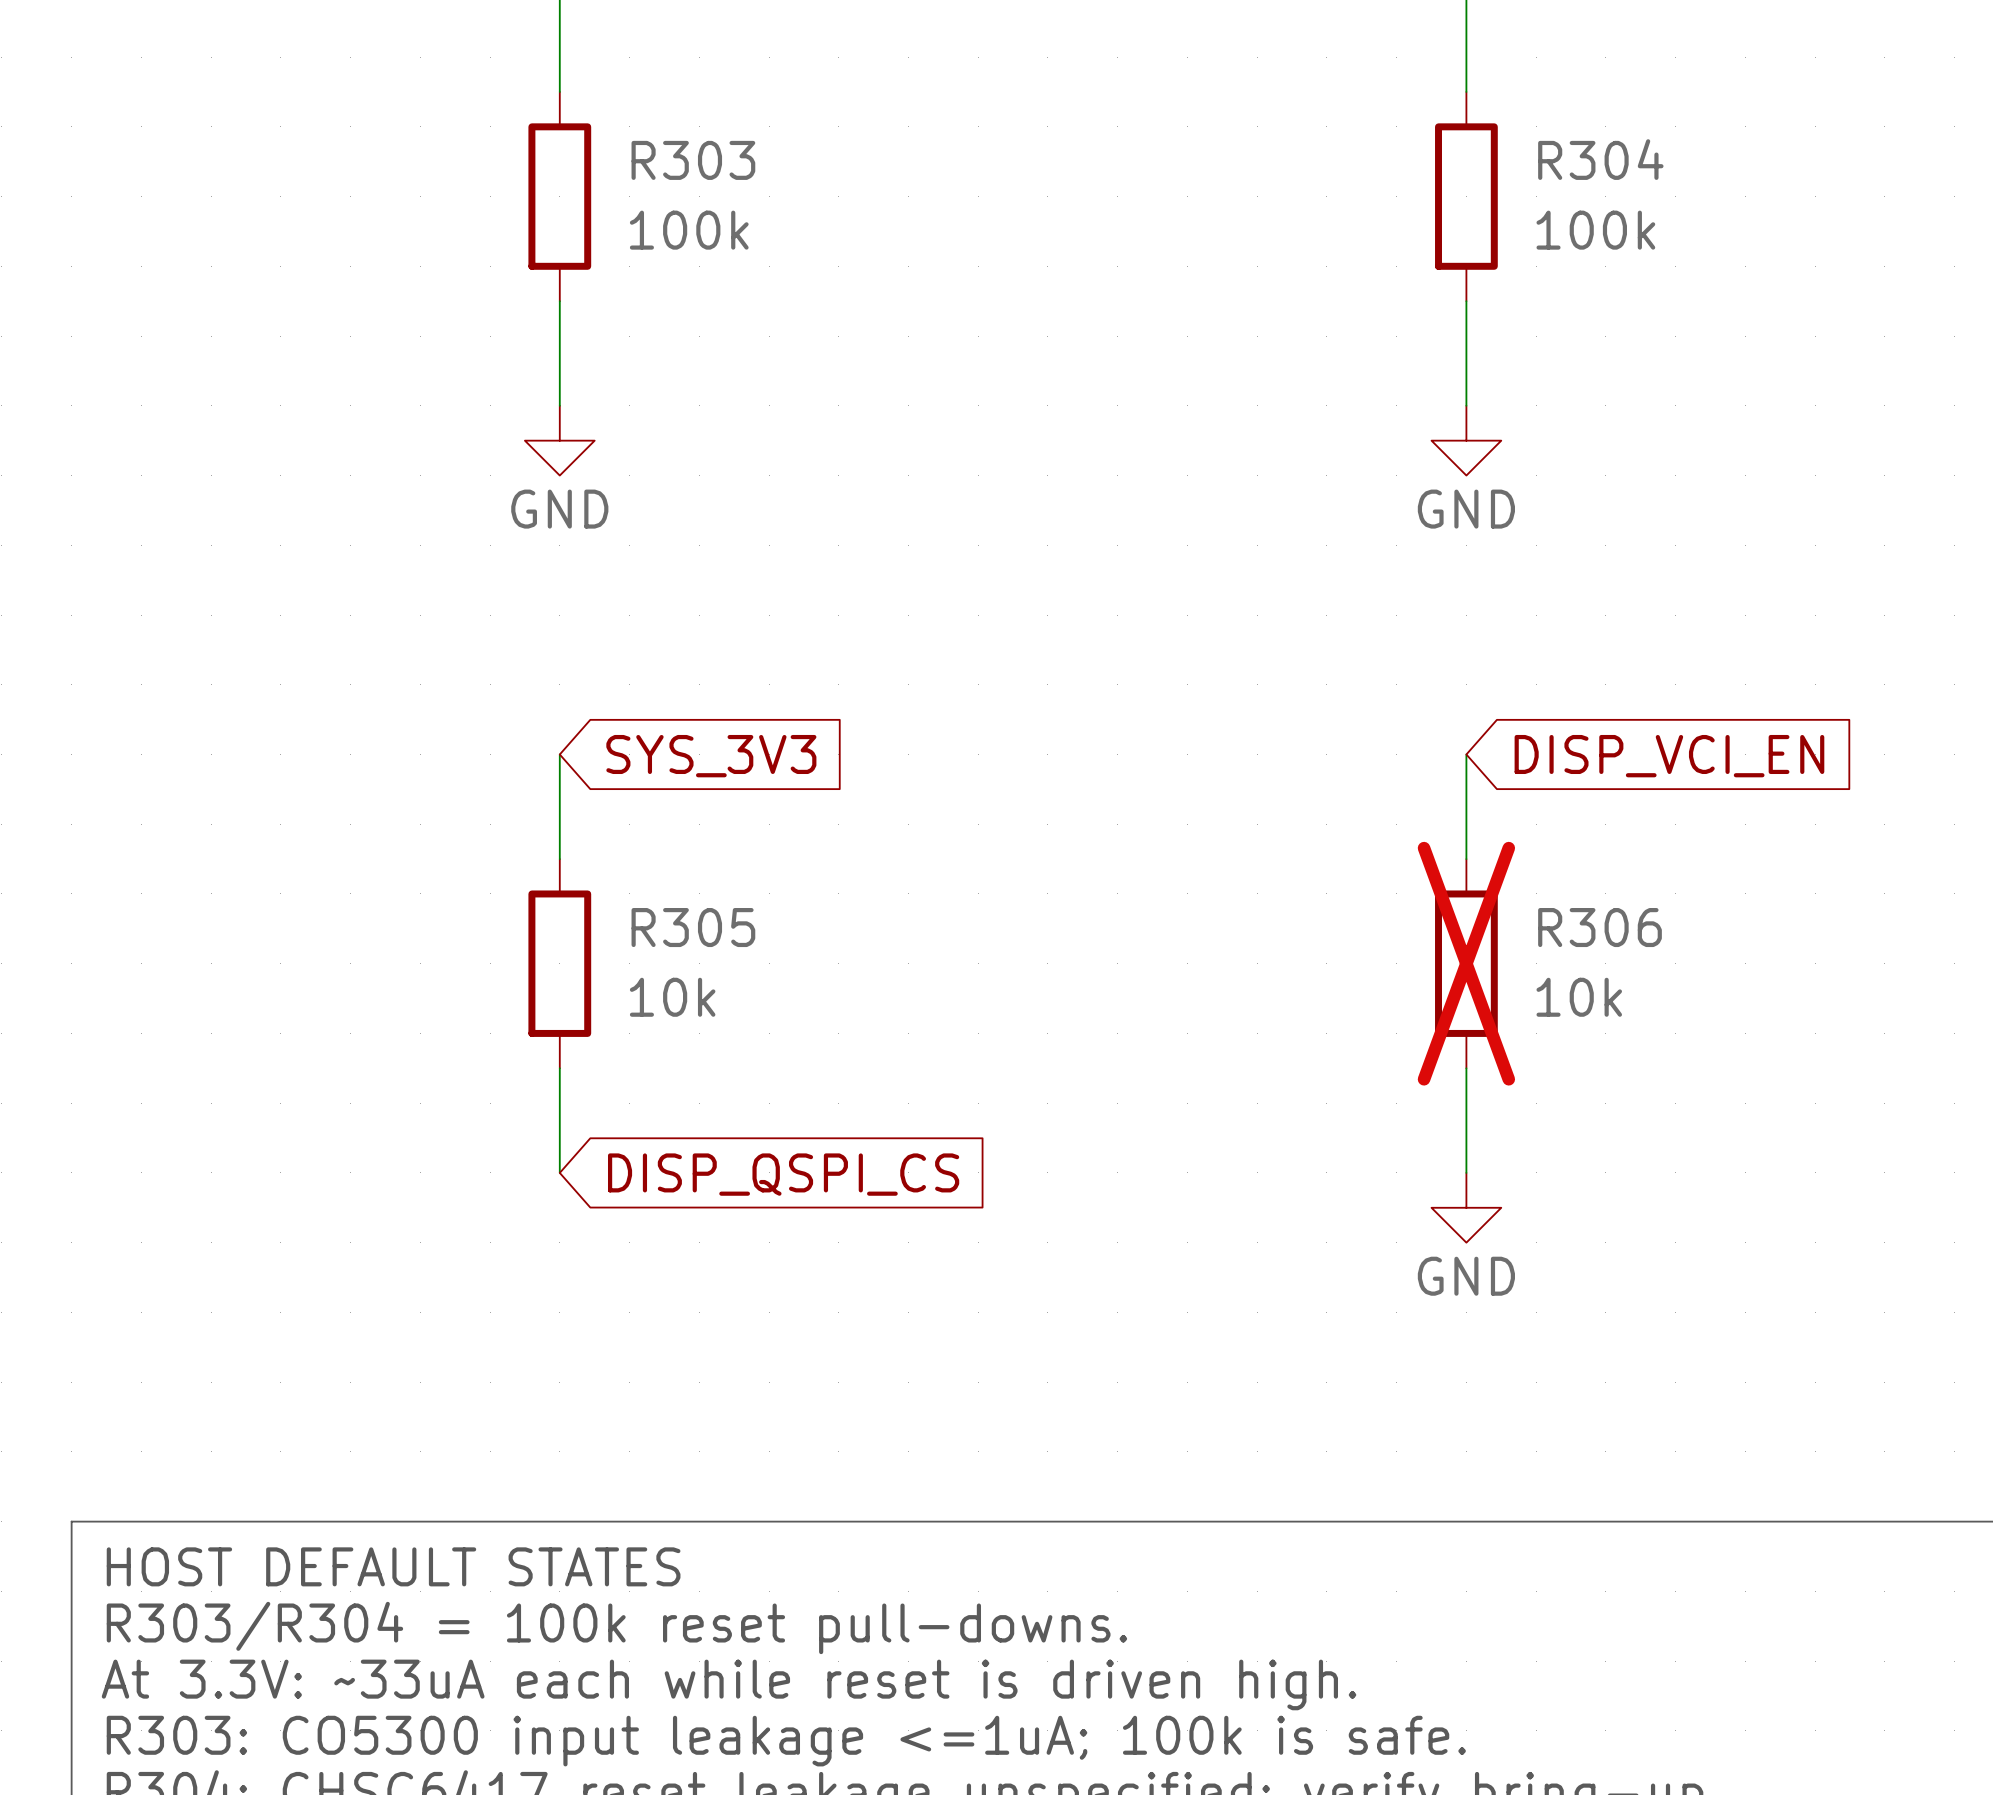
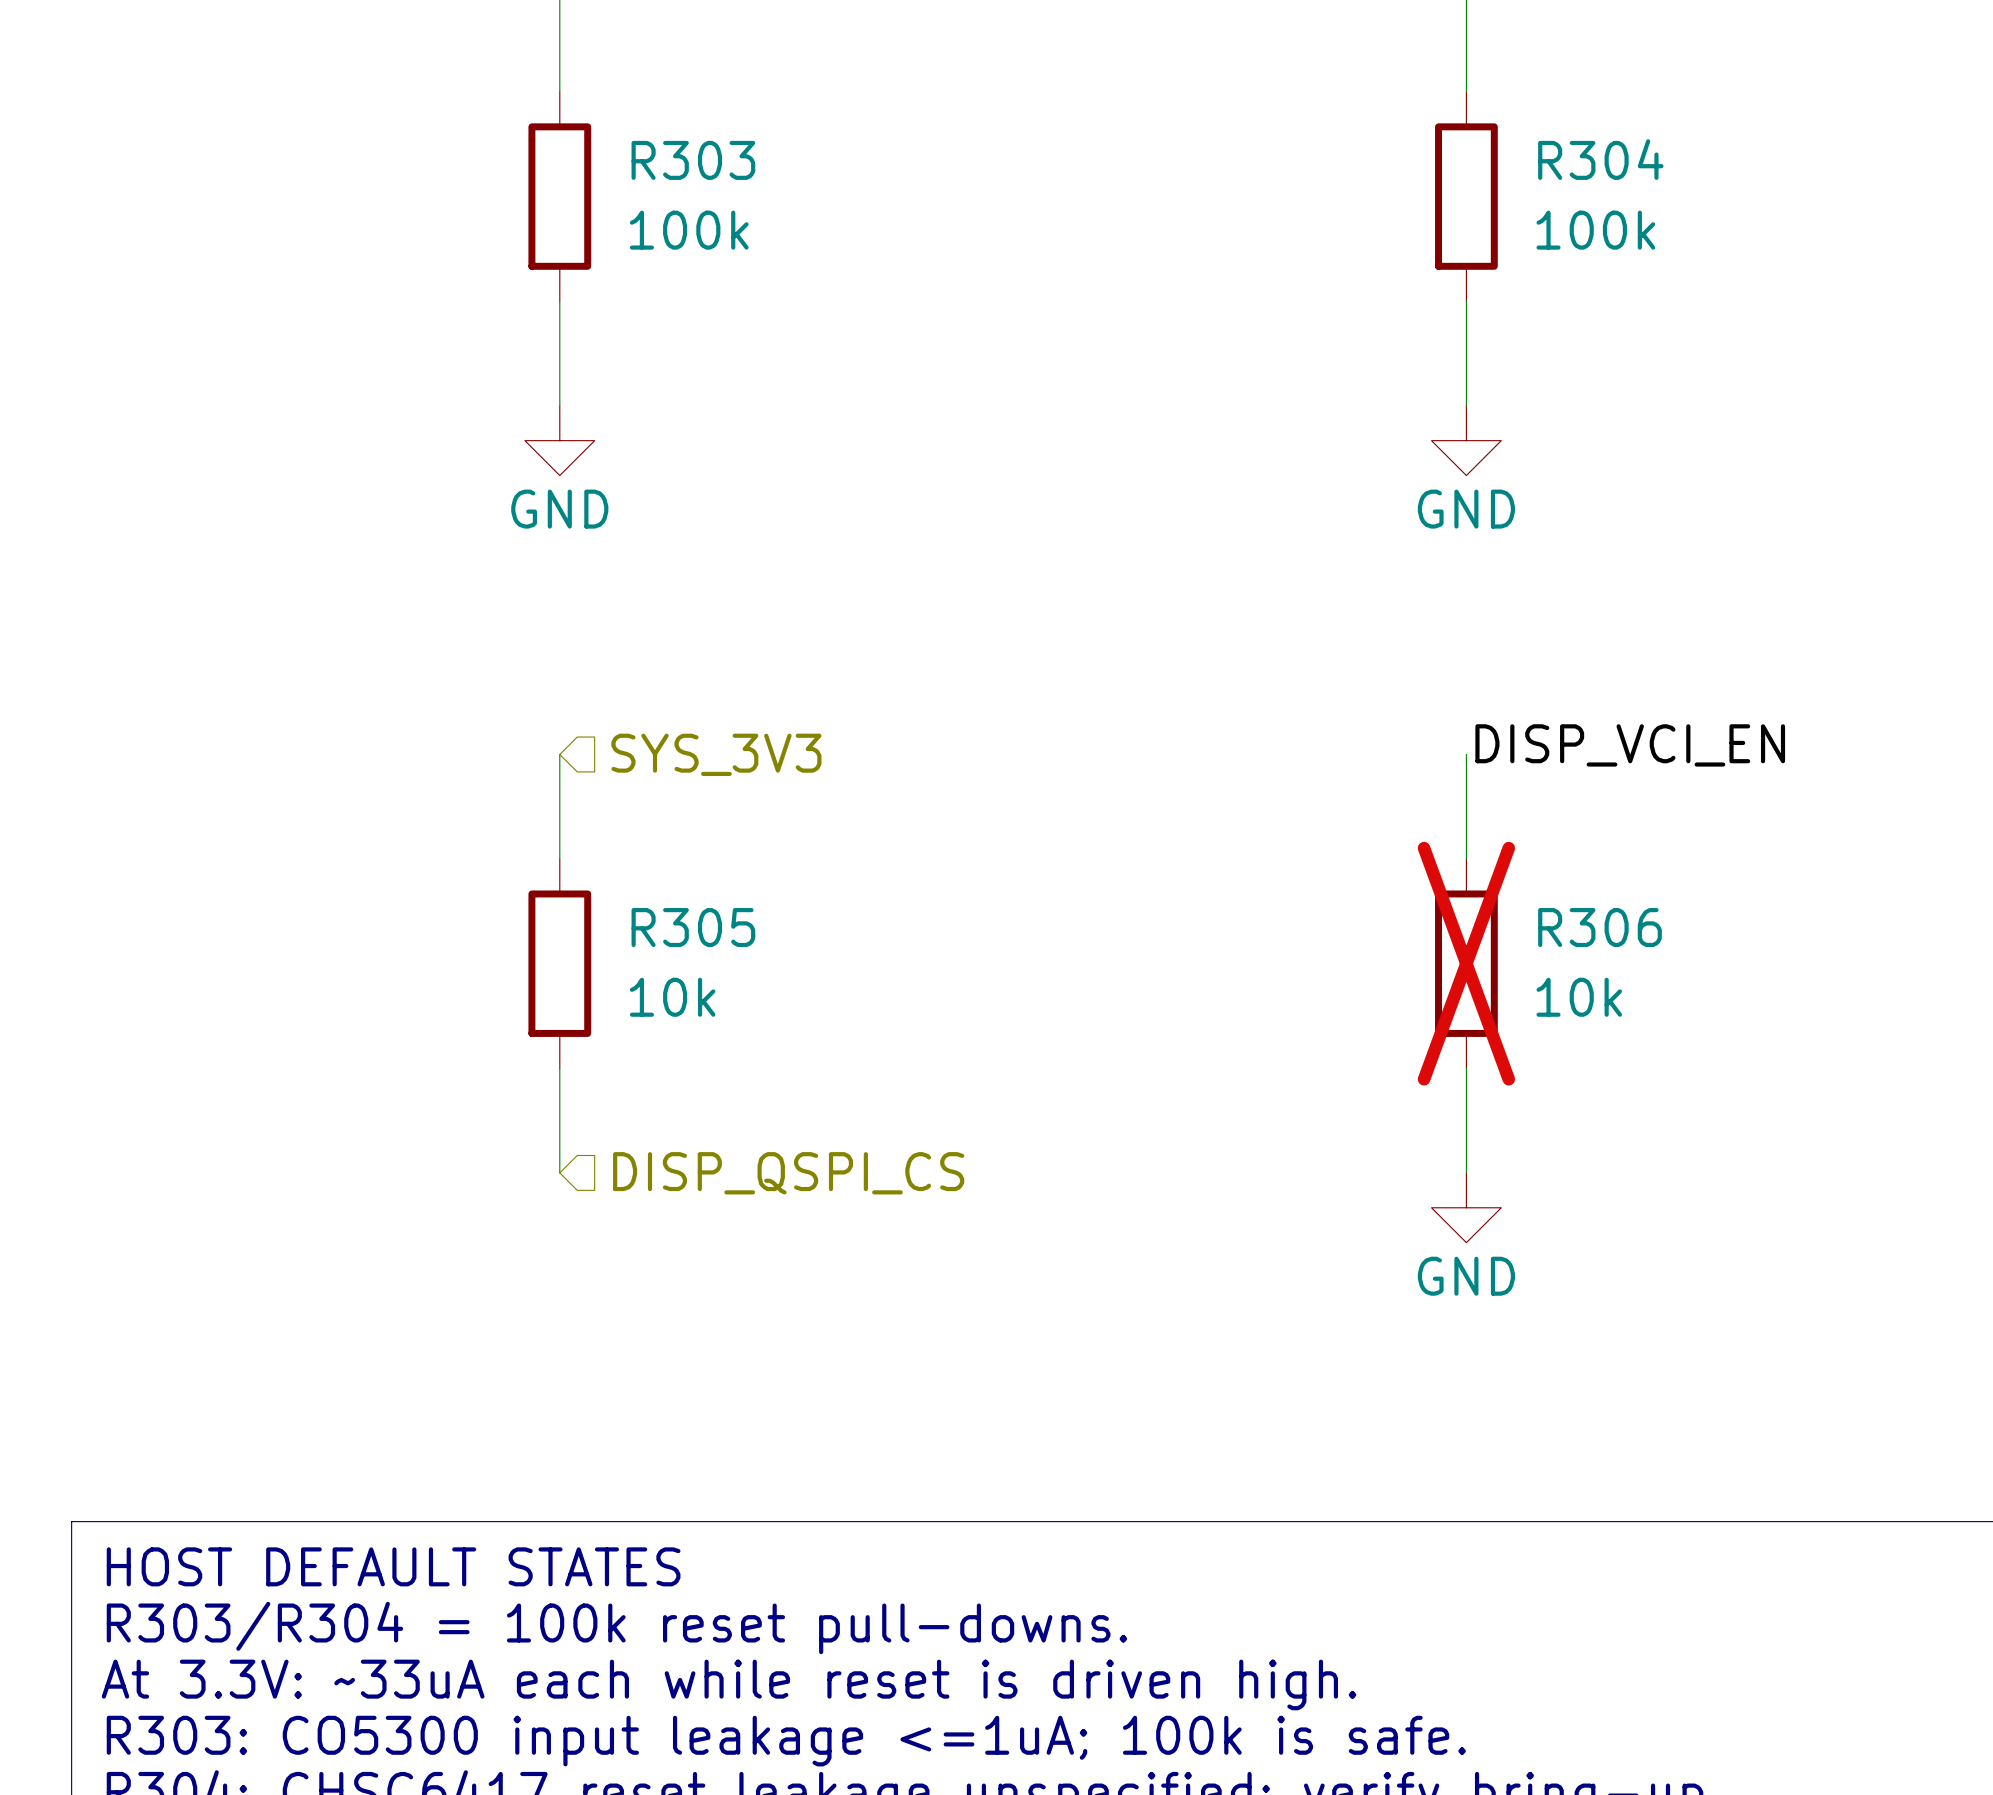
label: none -> DISP_VCI_EN (1630, 745)
hierarchical label: none -> SYS_3V3 (716, 754)
global label: SYS_3V3 (711, 756) -> none
global label: DISP_VCI_EN (1669, 756) -> none
hierarchical label: none -> DISP_QSPI_CS (788, 1173)
global label: DISP_QSPI_CS (783, 1174) -> none

